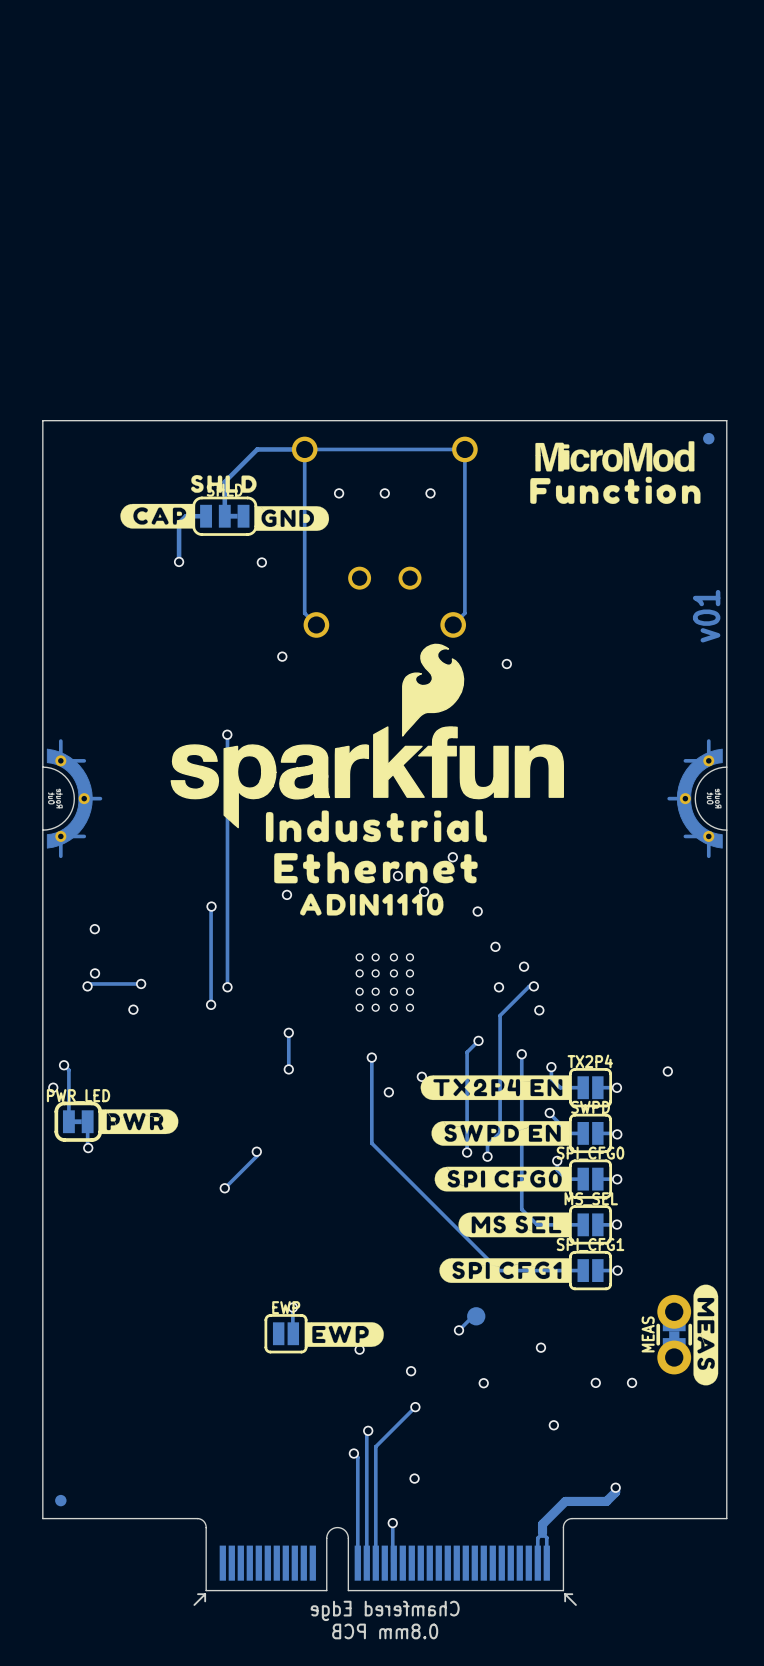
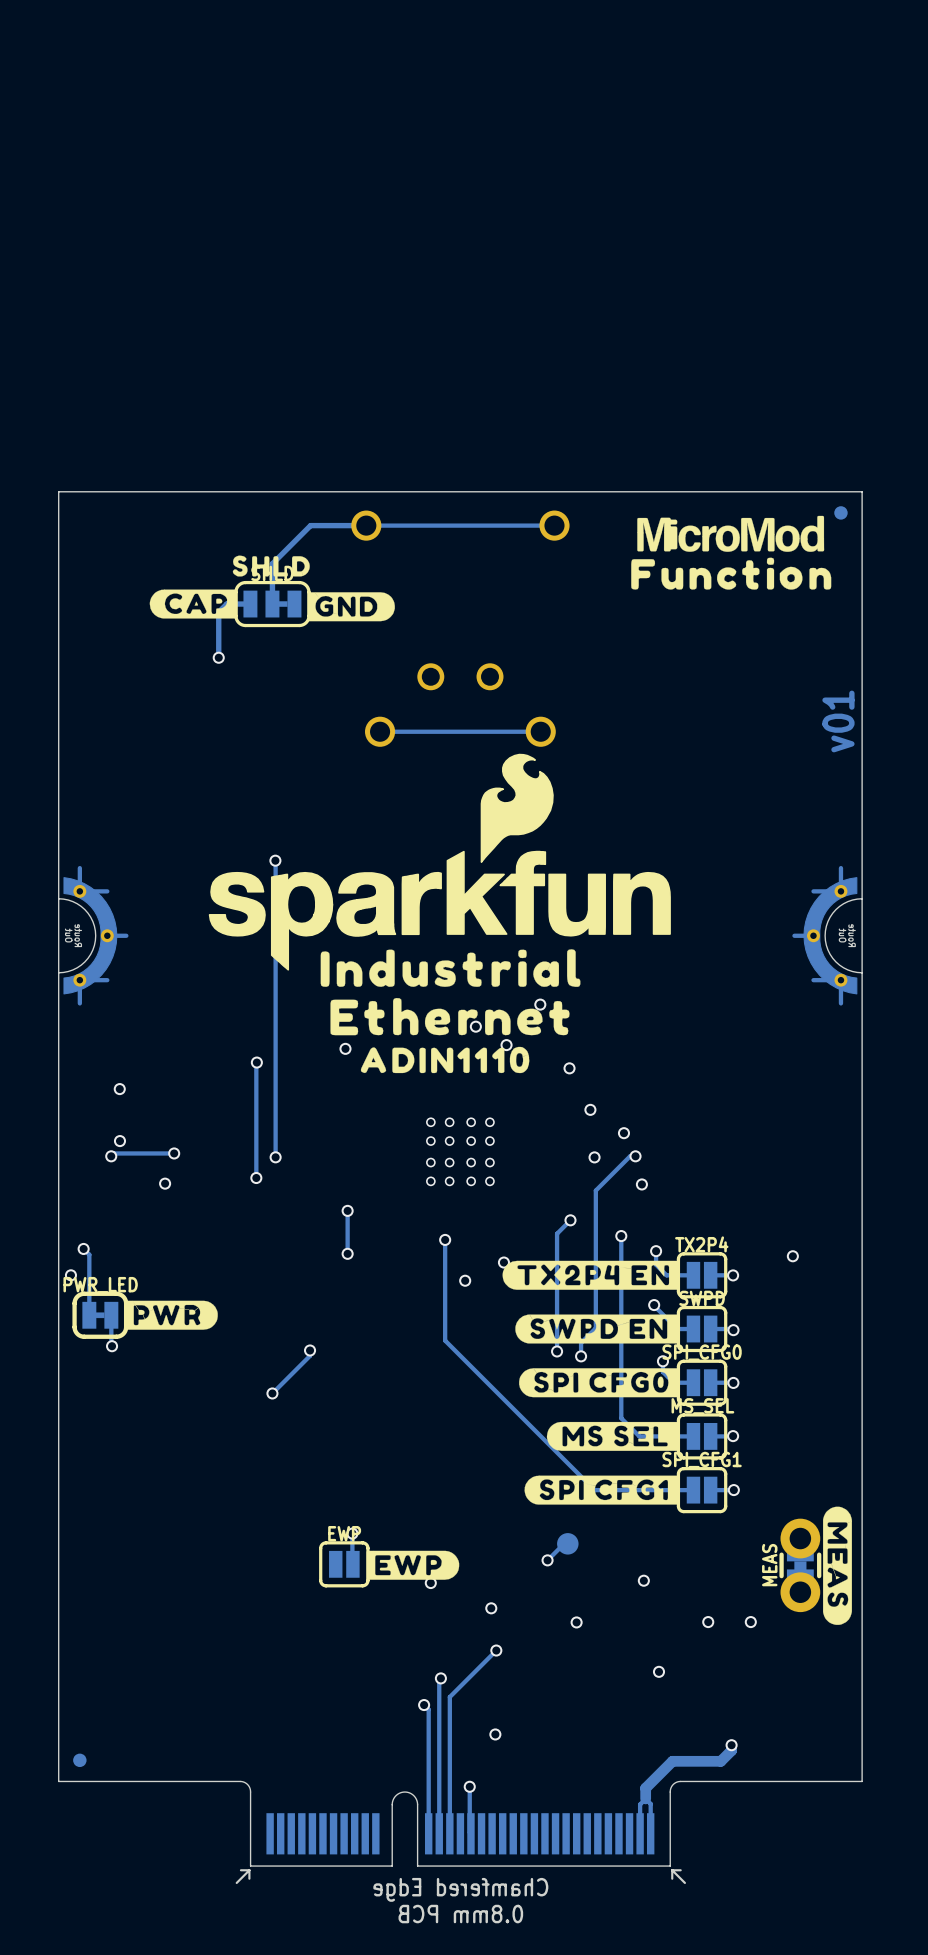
track: (304, 449) (304, 613) (316, 624) -> (540, 731) (380, 731)
track: (464, 449) (464, 613) (457, 621) (457, 624) -> none
via: (339, 493) -> none
via: (384, 493) -> none
via: (430, 493) -> none
via: (261, 562) -> none
via: (282, 656) -> none
via: (506, 664) -> none

